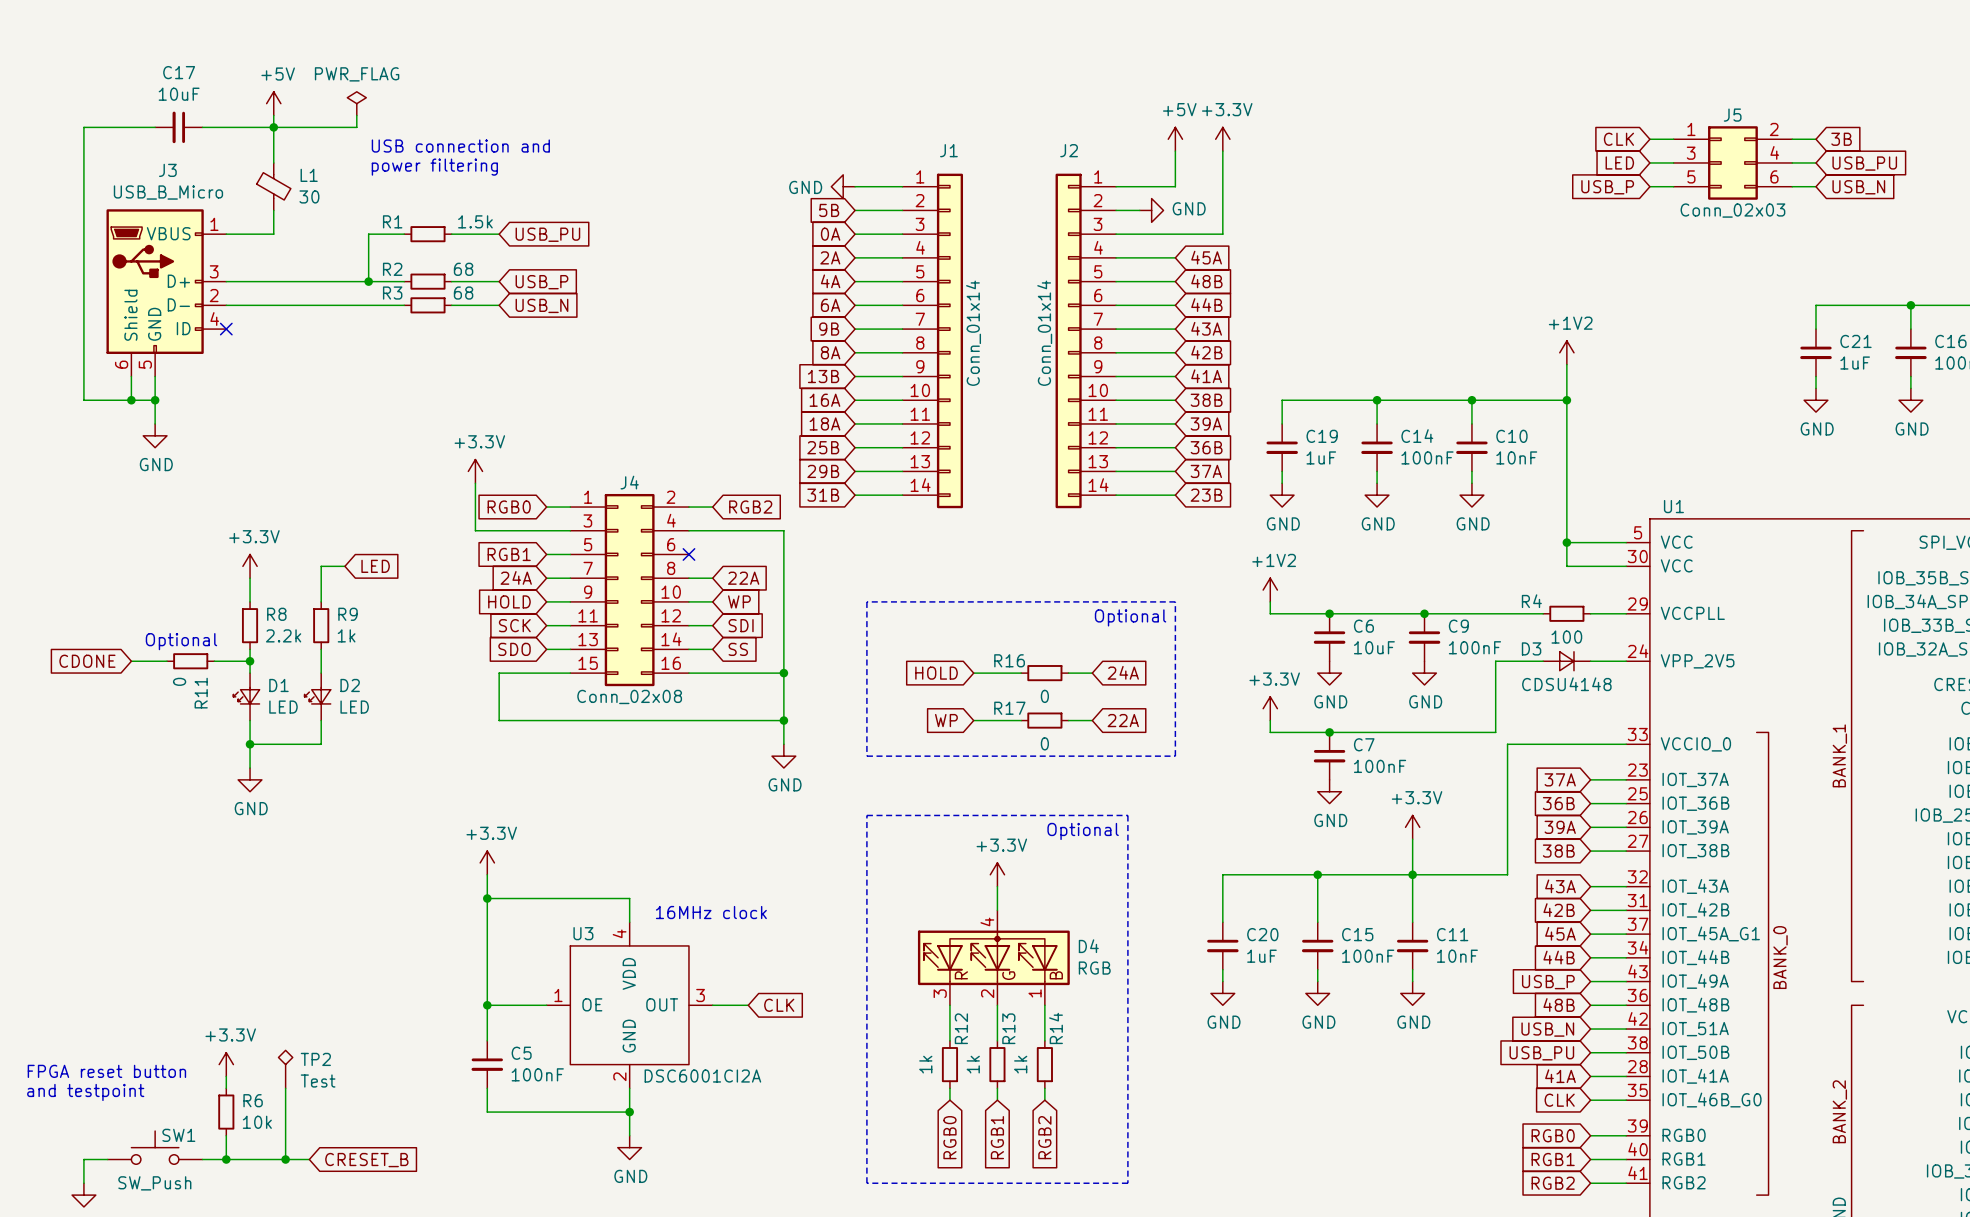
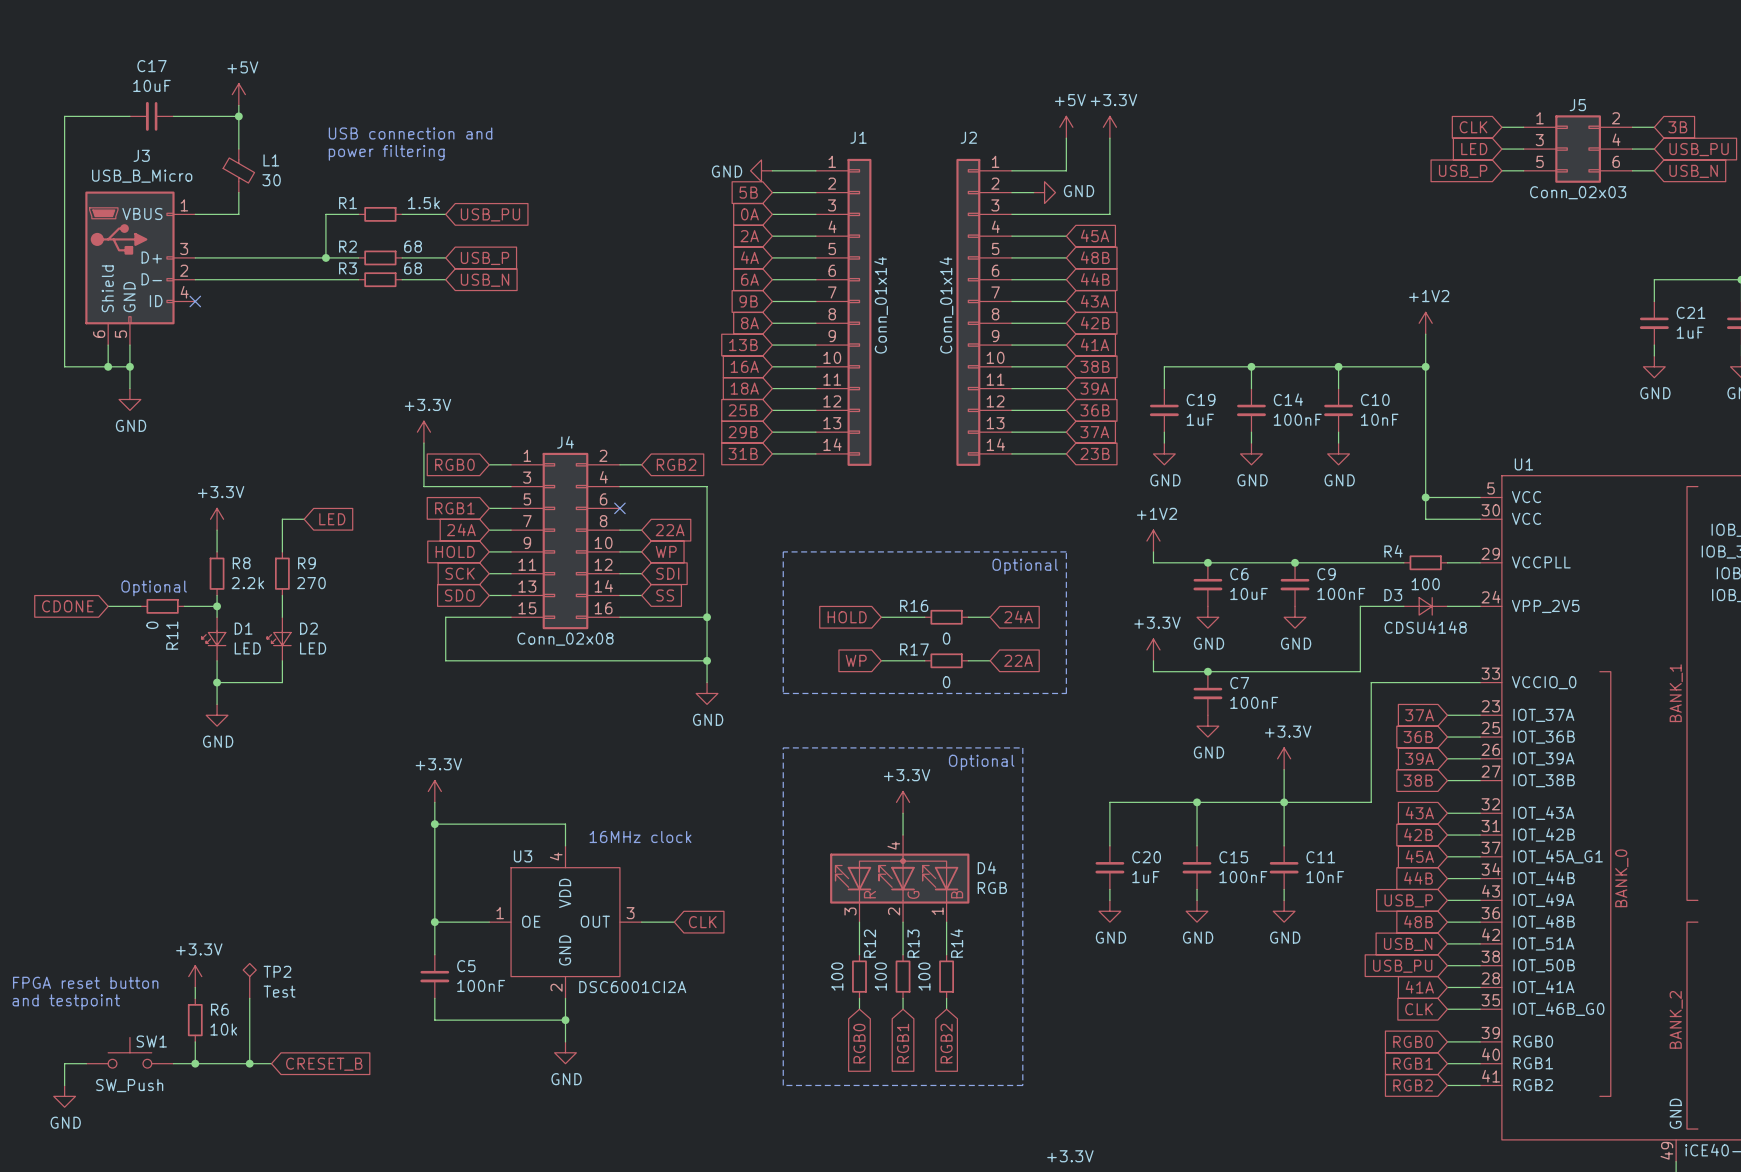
power symbol: PWR_FLAG (356, 103) -> none
wire: (356, 115) (356, 127) (273, 127) -> none
R9 value: 1k (346, 635) -> 270 (311, 583)
R12 value: 1k (925, 1064) -> 100 (837, 976)
R13 value: 1k (973, 1064) -> 100 (880, 976)
R14 value: 1k (1020, 1064) -> 100 (924, 976)

